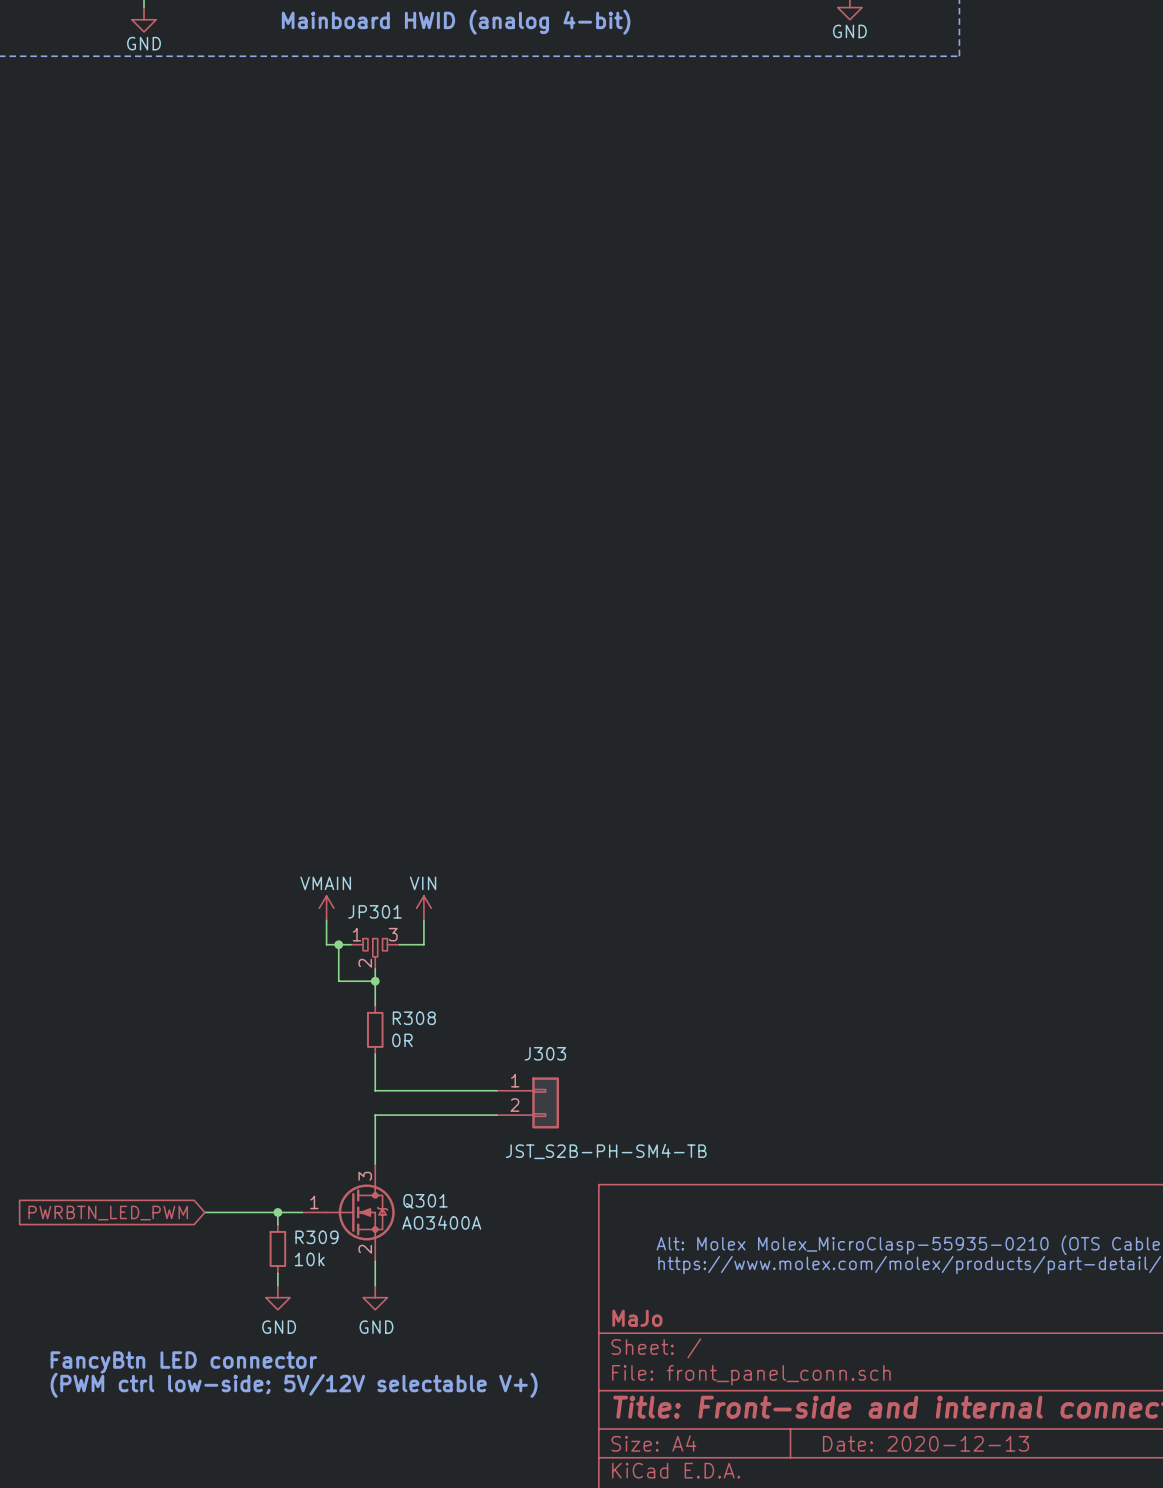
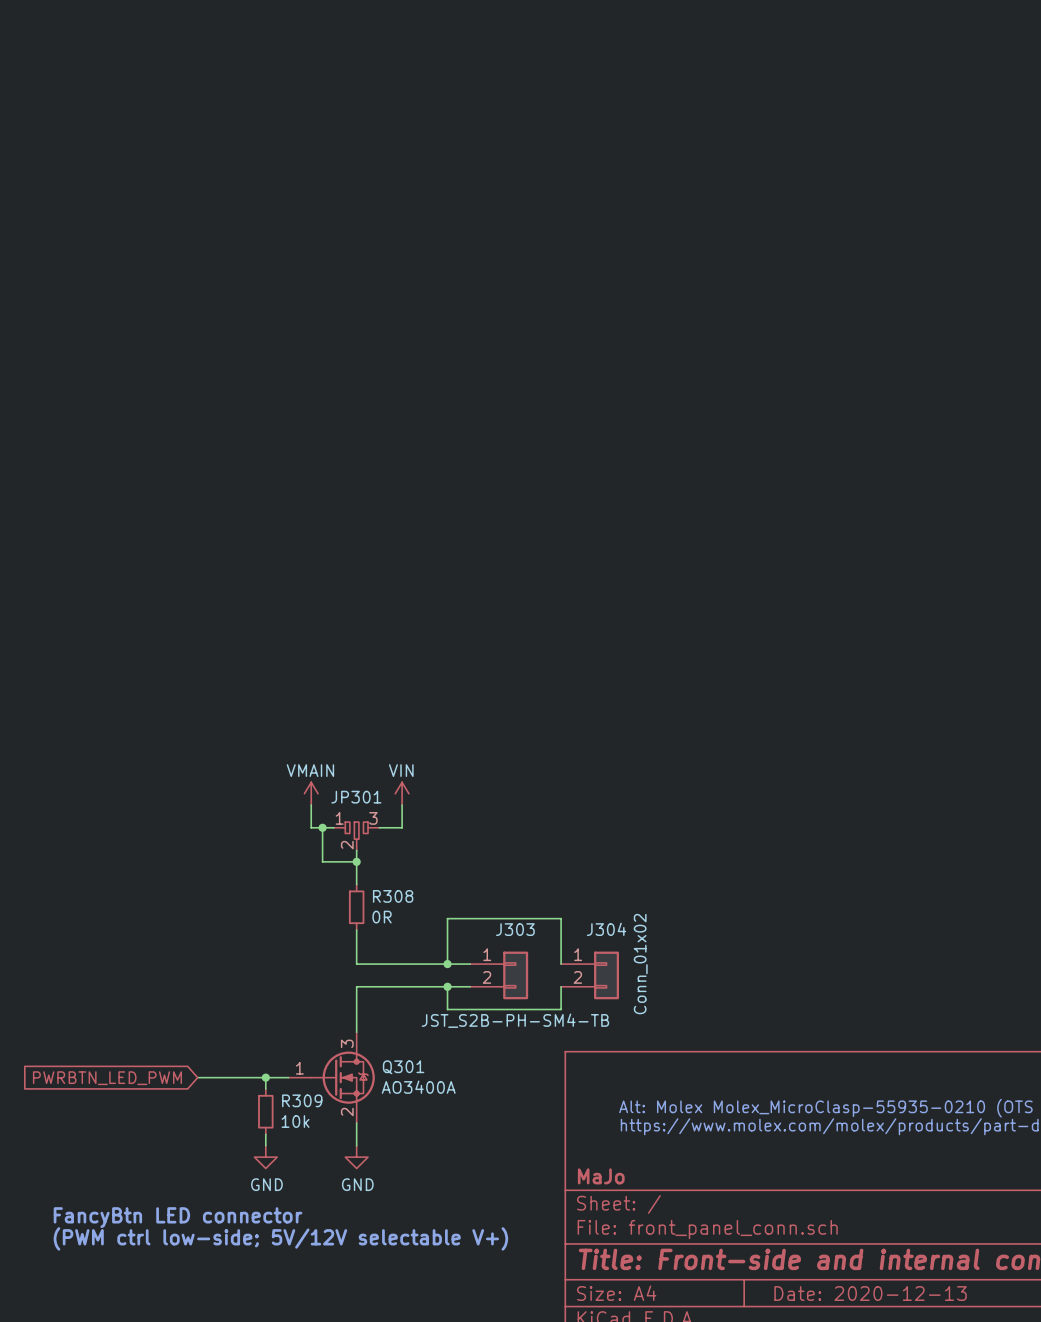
wire: none -> (447, 964) (447, 918) (561, 918) (561, 964)
junction: none -> (447, 964)
J304: none -> Conn_01x02 (590, 975)
wire: none -> (447, 986) (447, 1009) (561, 1009) (561, 986)
junction: none -> (447, 986)
J303 value position: JST_S2B-PH-SM4-TB (606, 1151) -> JST_S2B-PH-SM4-TB (515, 1020)

